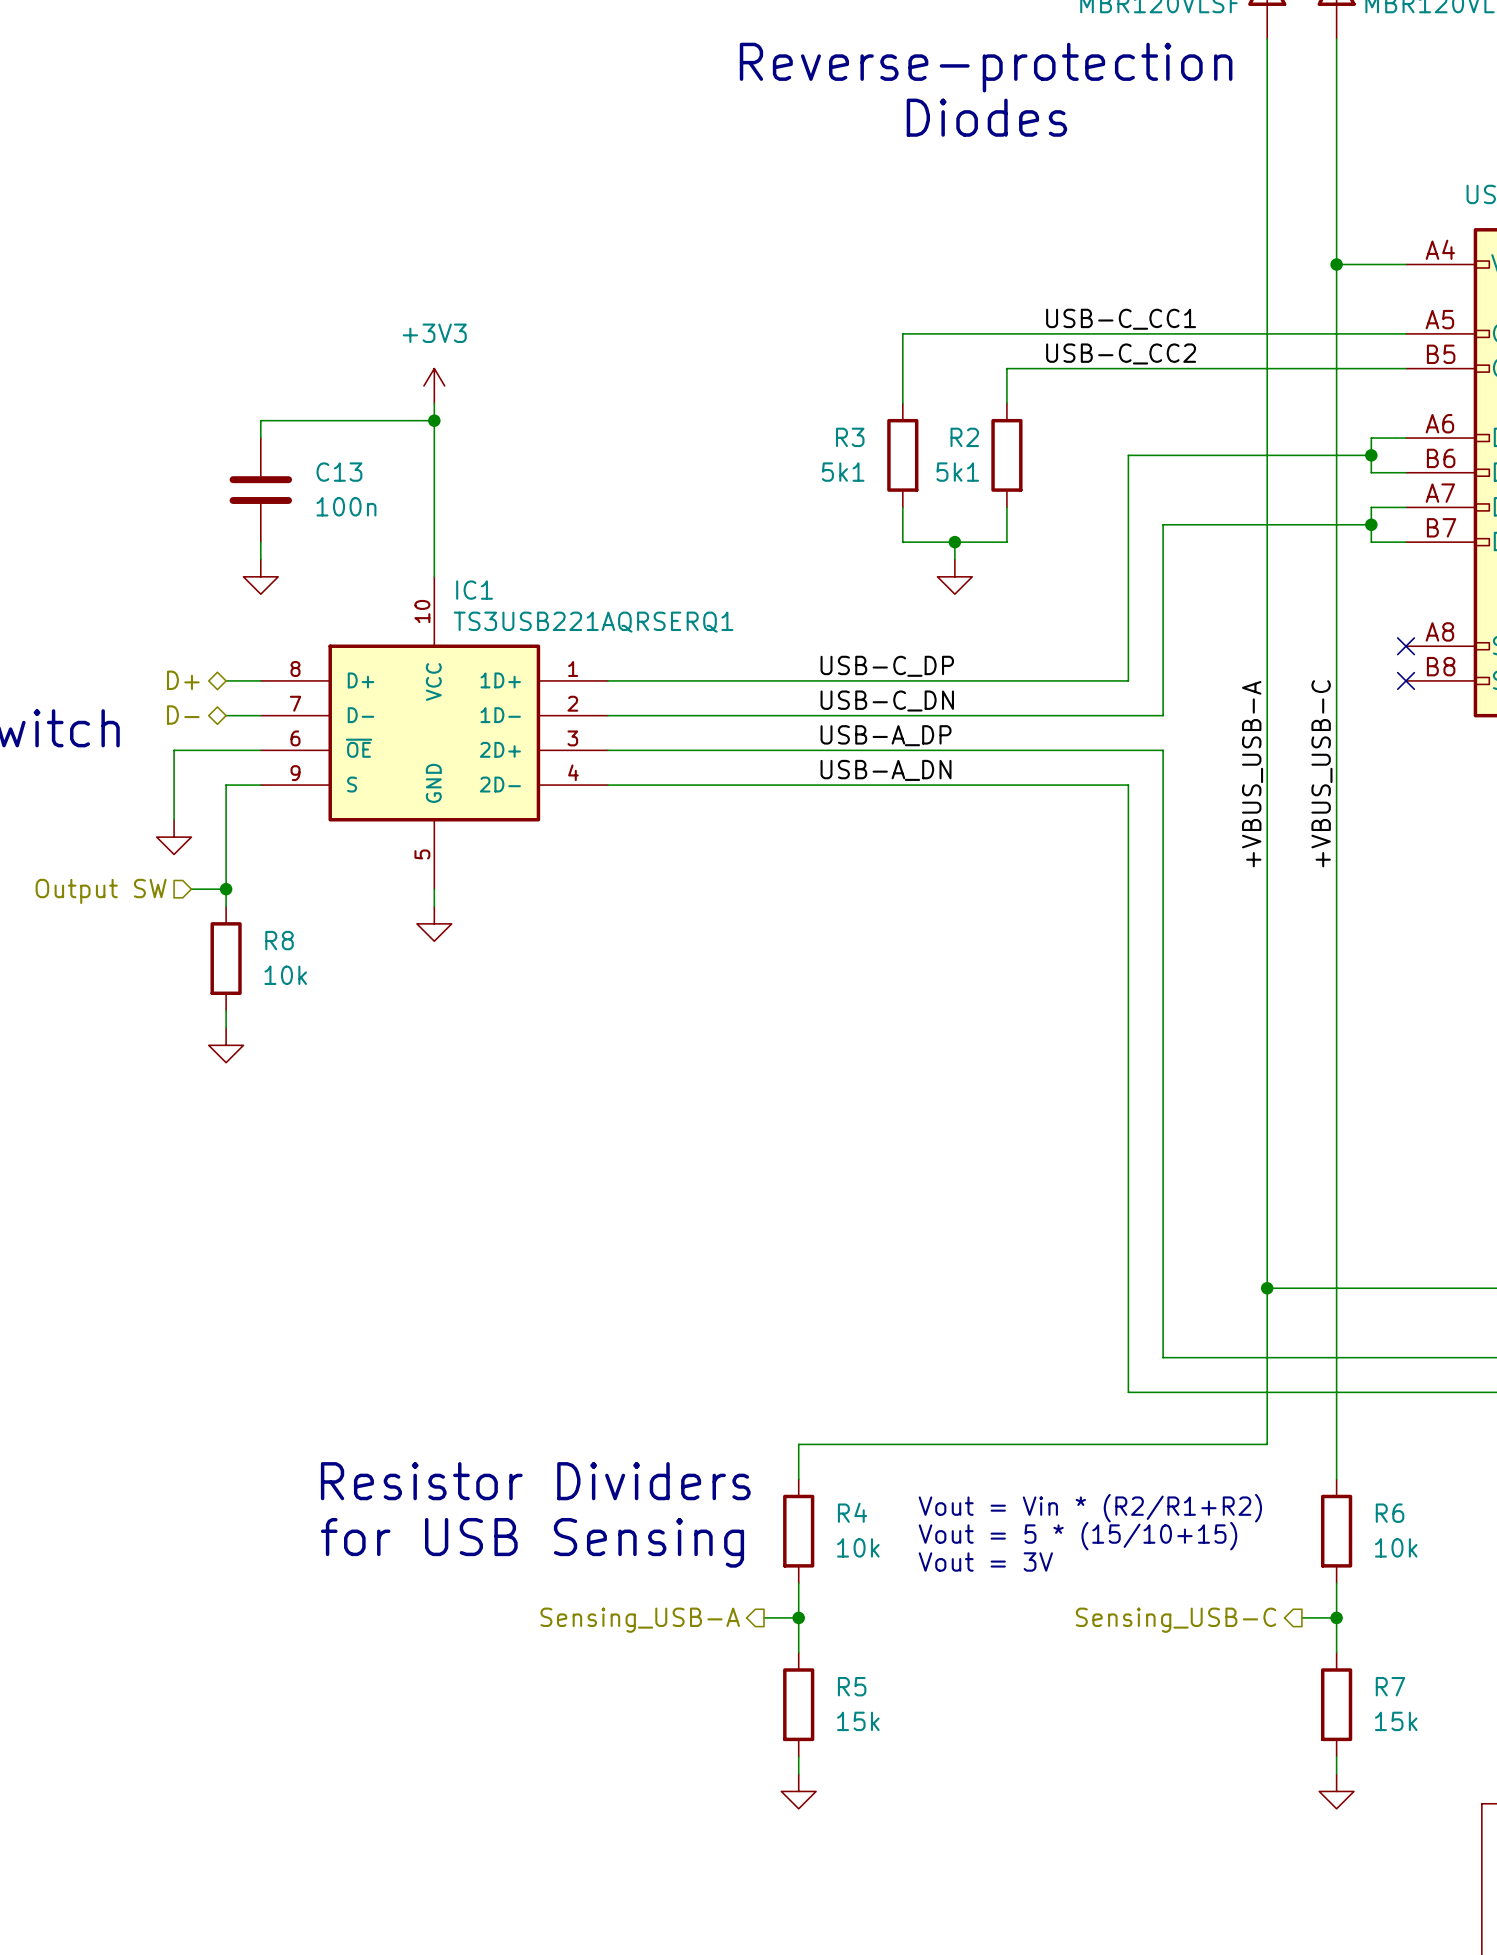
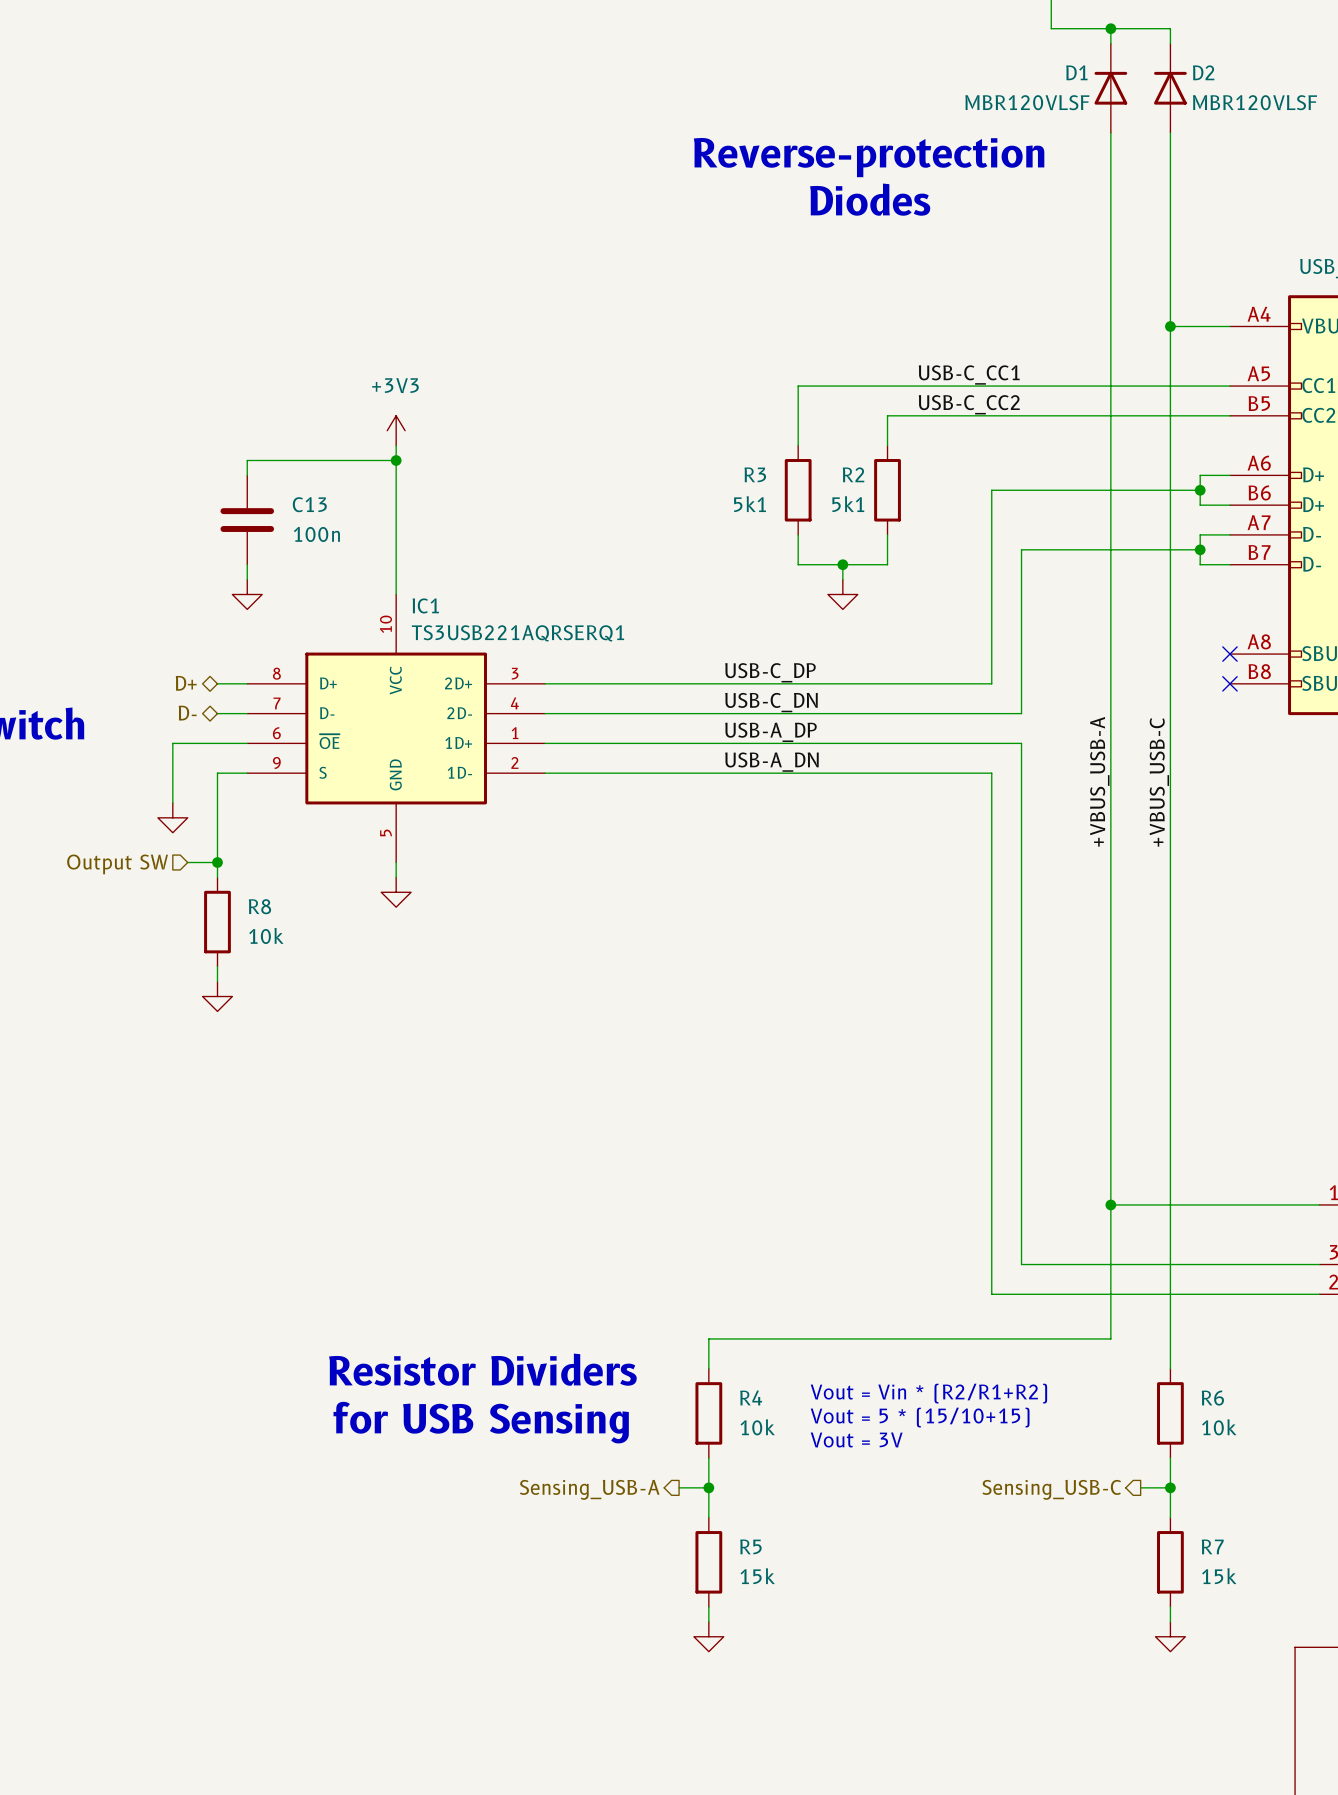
IC1 pin number: 1 (573, 669) -> 3 (515, 673)
IC1 pin name: 1D+ (500, 680) -> 2D+ (458, 683)
IC1 pin number: 2 (572, 703) -> 4 (514, 703)
IC1 pin name: 1D- (500, 715) -> 2D- (459, 713)
IC1 pin number: 3 (572, 738) -> 1 (515, 733)
IC1 pin name: 2D+ (500, 749) -> 1D+ (458, 742)
IC1 pin number: 4 (573, 772) -> 2 (514, 762)
IC1 pin name: 2D- (500, 784) -> 1D- (459, 772)

